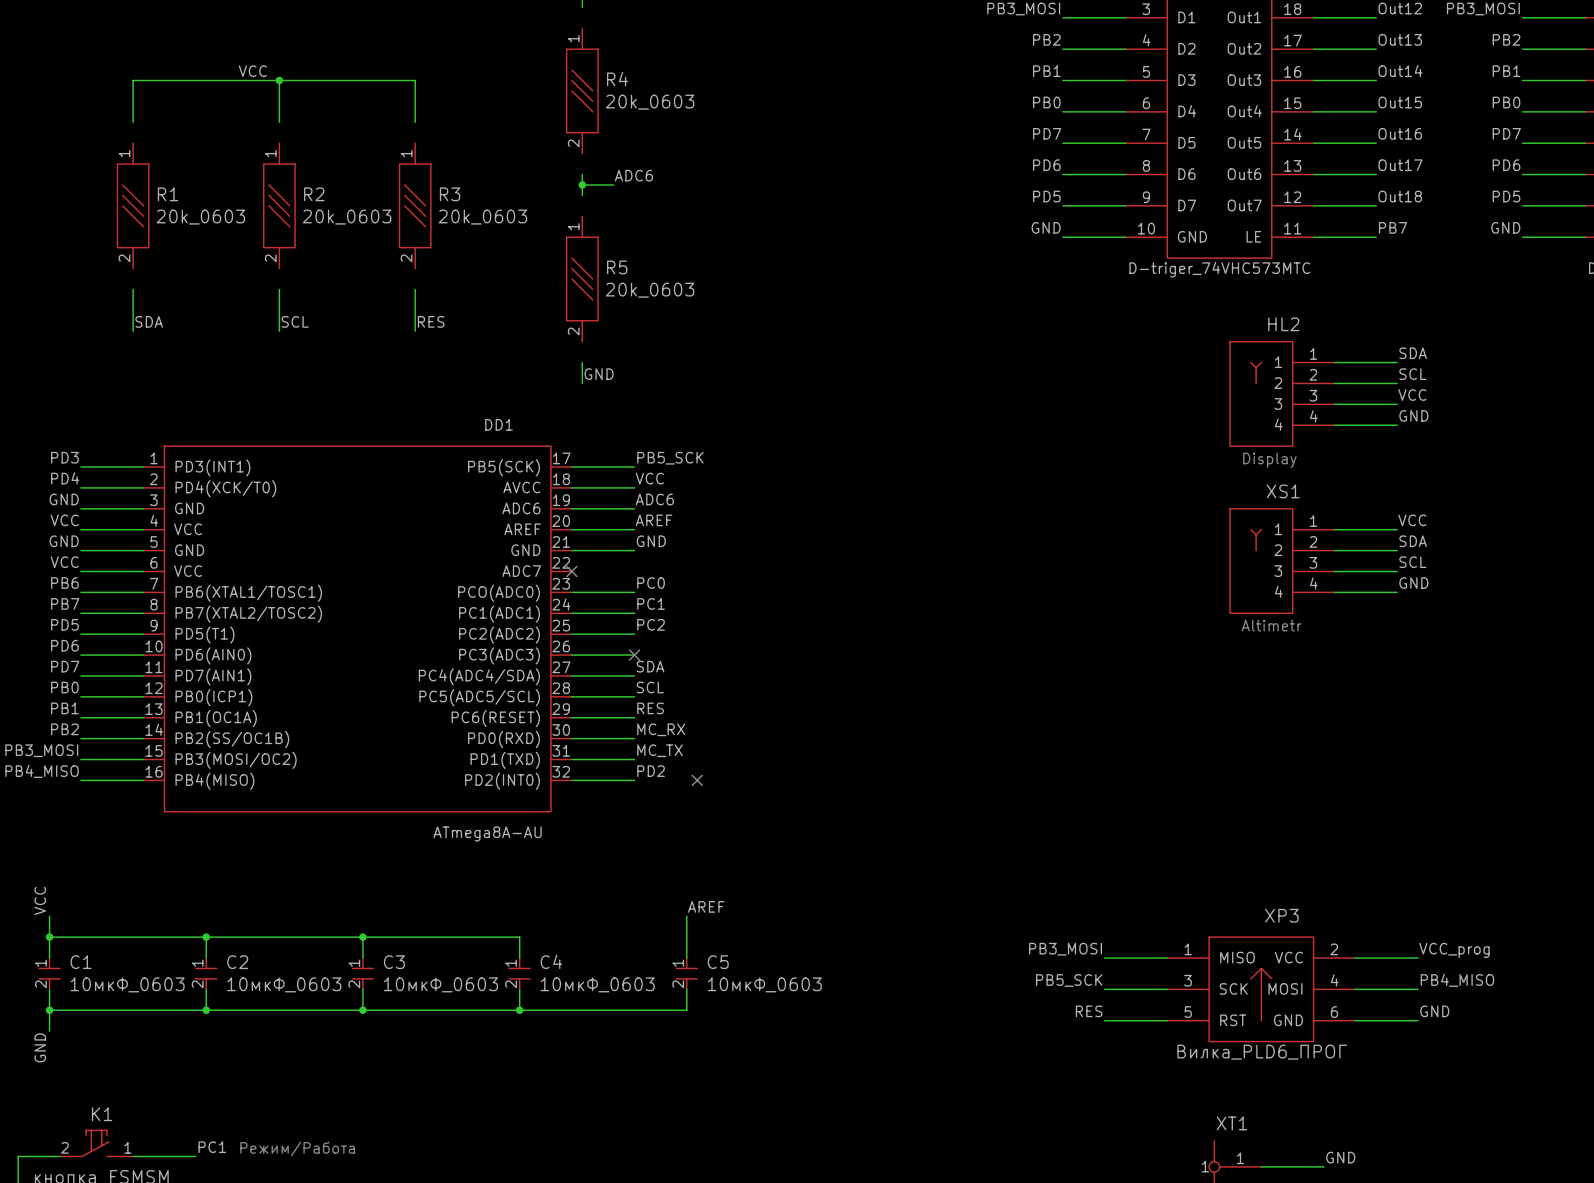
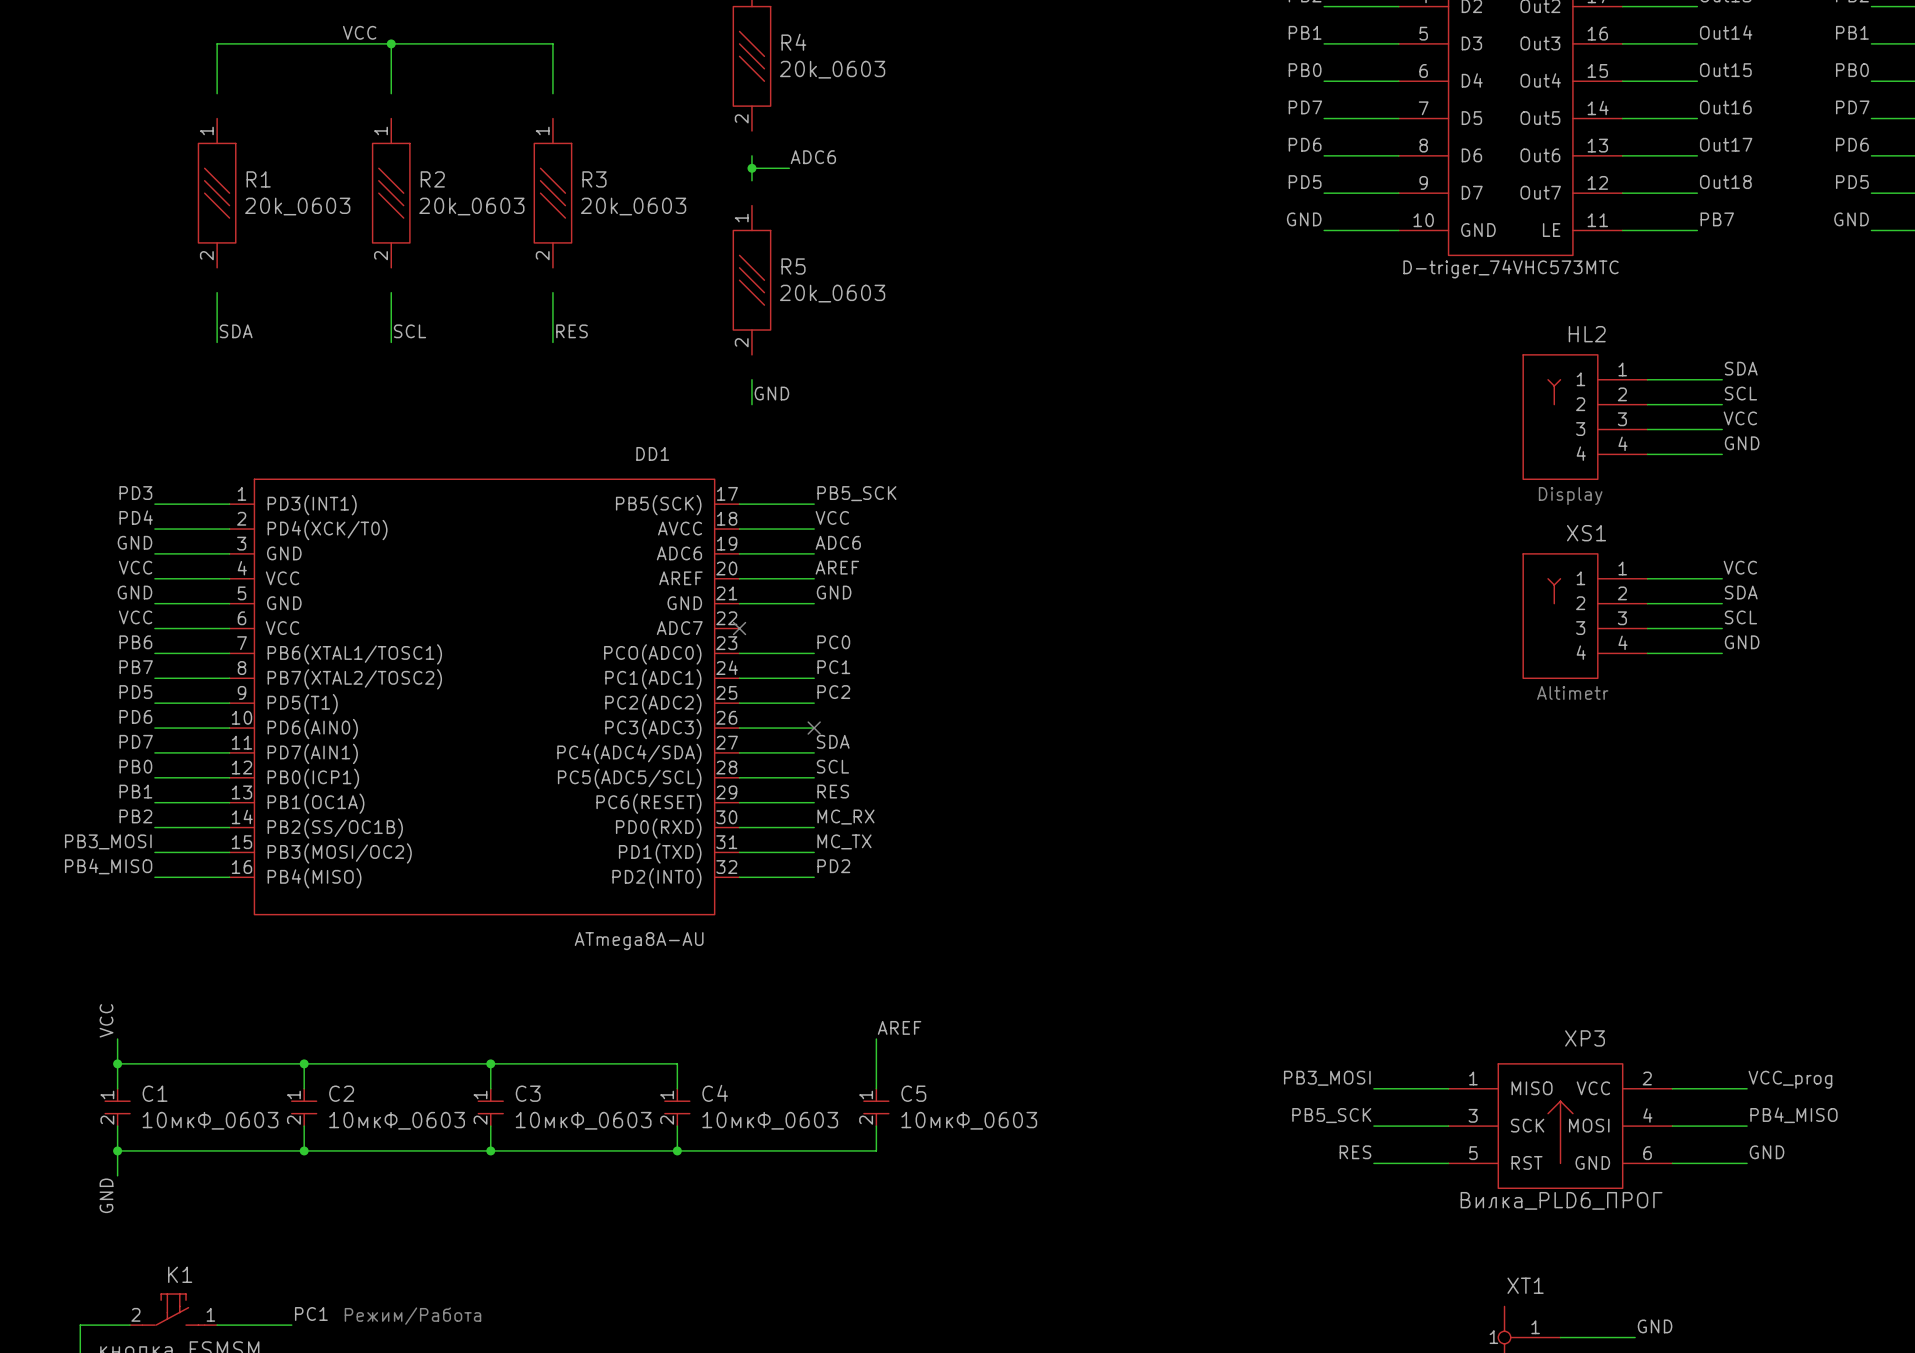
no-connect mark: (697, 780) -> none

